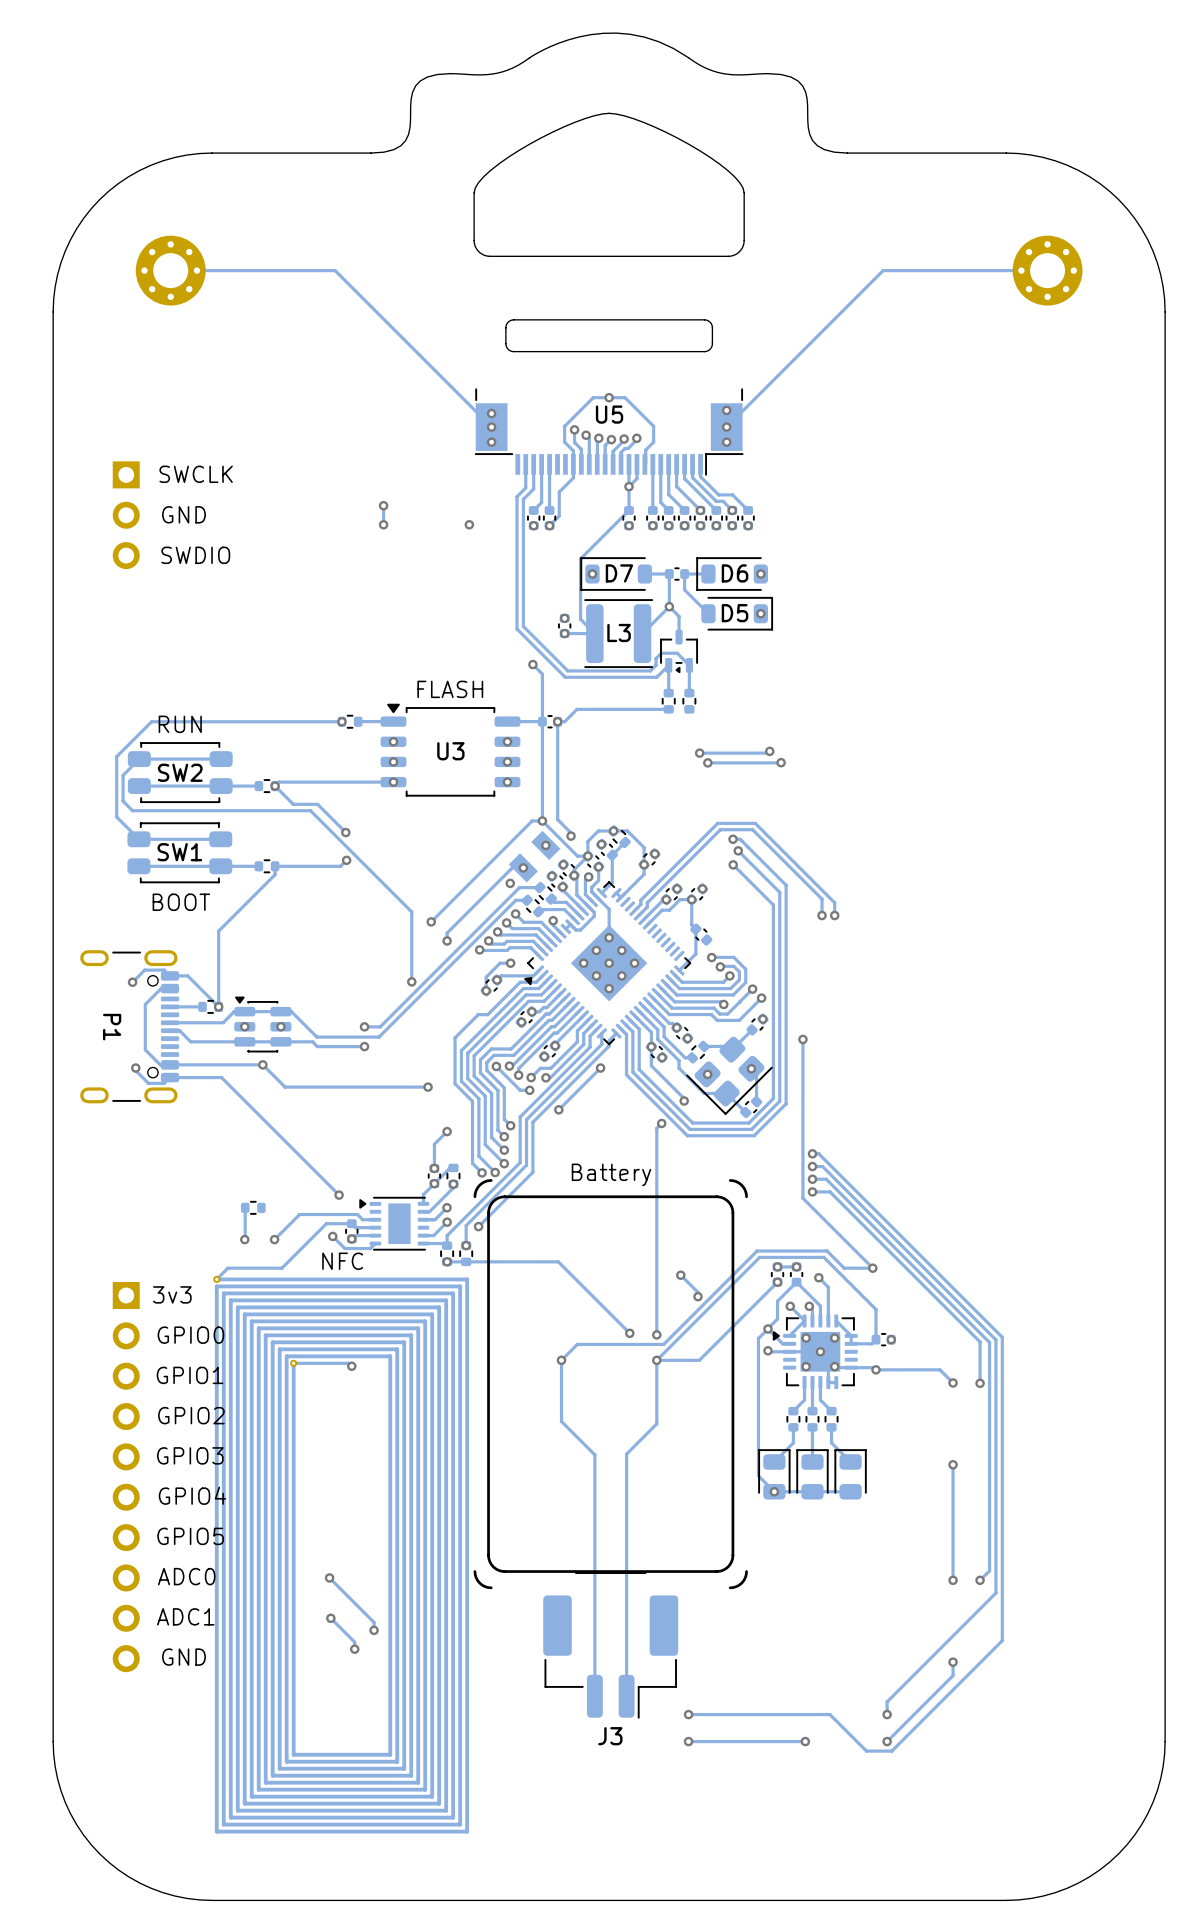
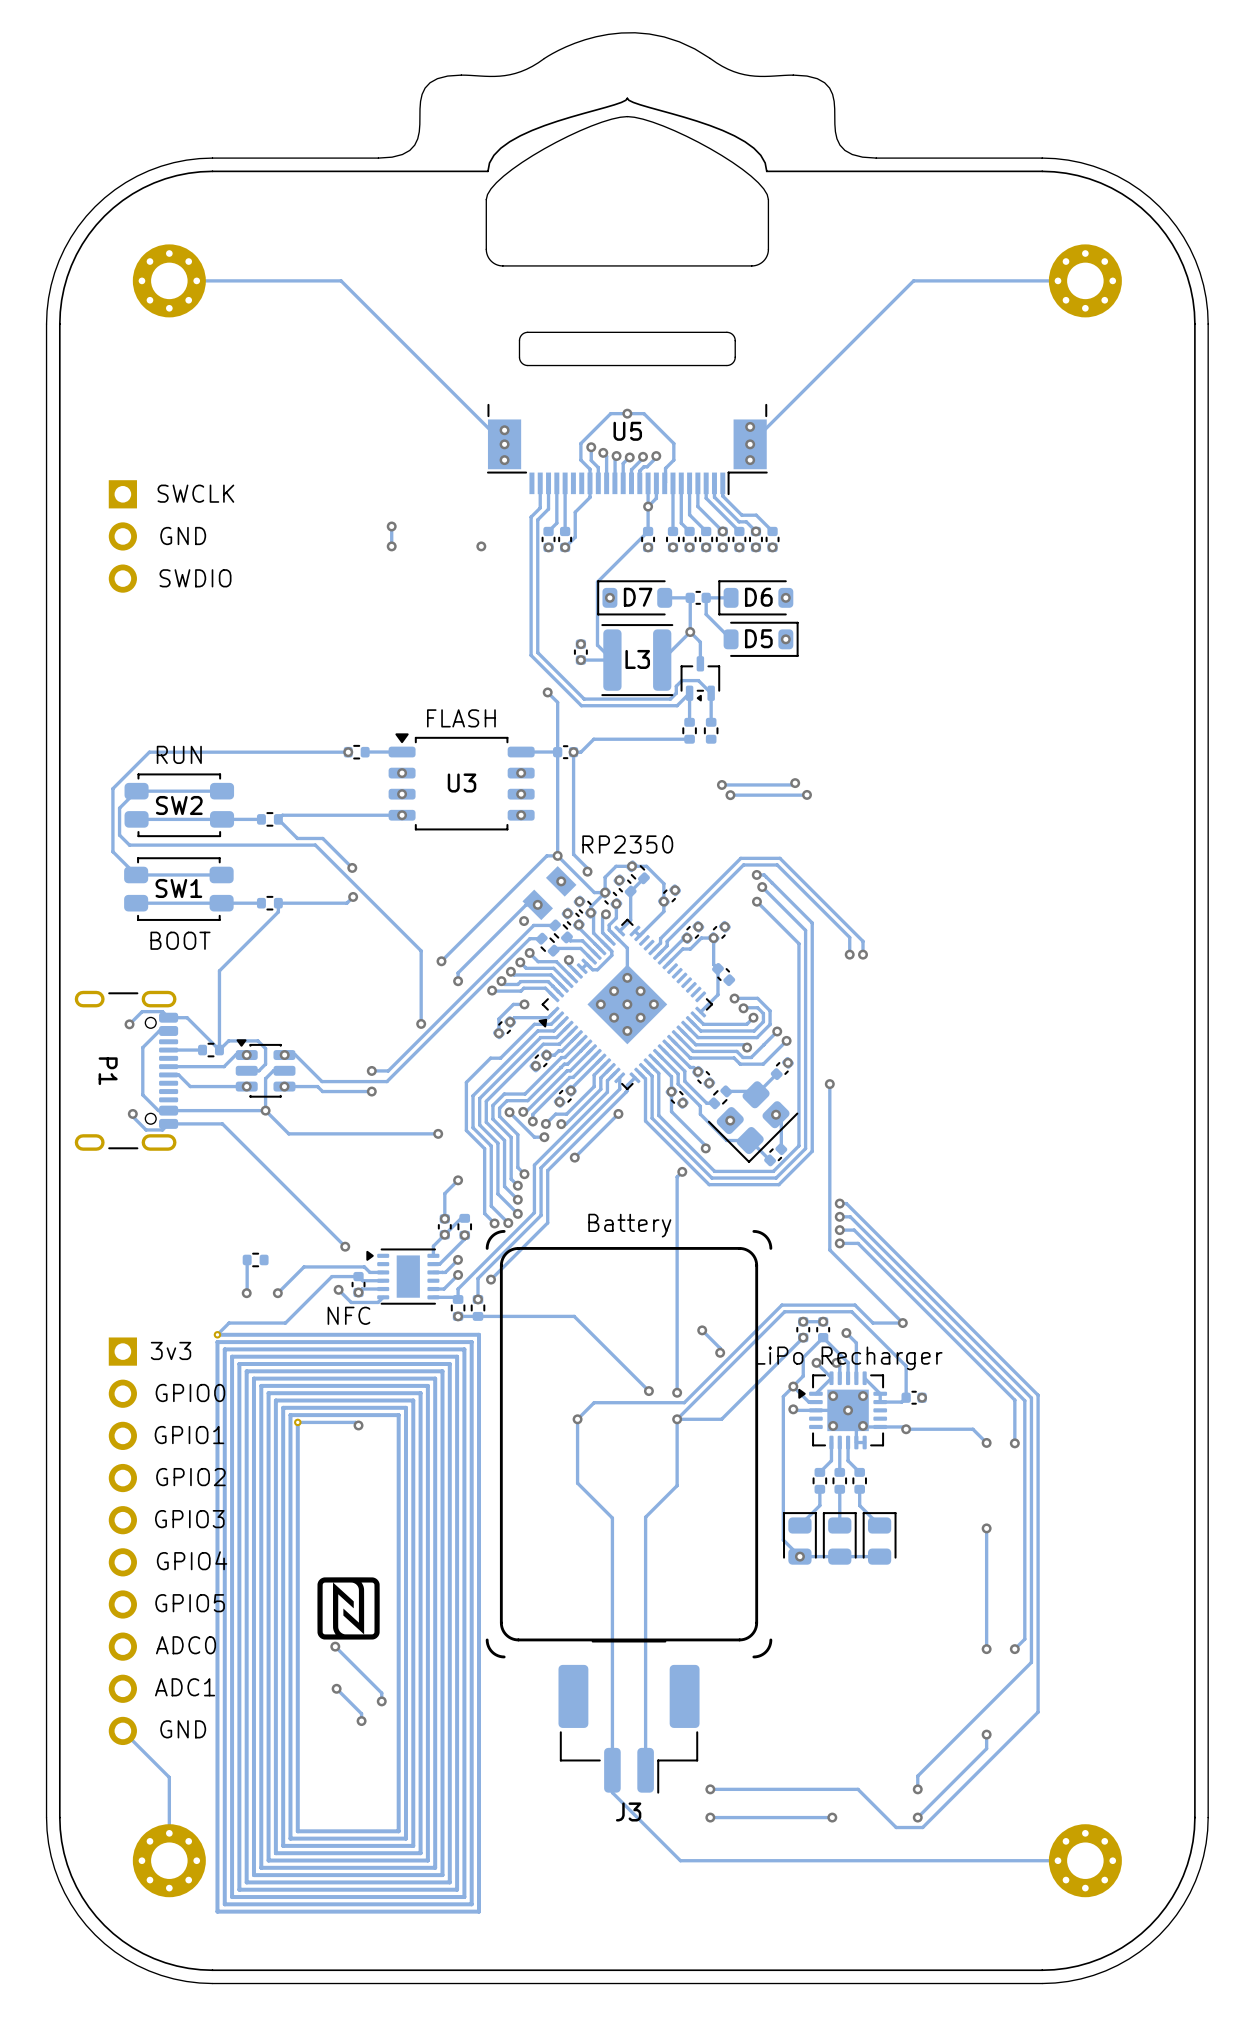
line: none -> (627, 98) (633, 102) (697, 121) (734, 135) (753, 148) (760, 155) (766, 171) (1042, 171) (1066, 173) (1089, 178) (1121, 193) (1150, 216) (1172, 244) (1187, 276) (1193, 300) (1194, 324) (1194, 1817) (1190, 1853) (1183, 1875) (1172, 1897) (1158, 1916) (1141, 1933) (1121, 1947) (1100, 1958) (1077, 1966) (1054, 1969) (212, 1970) (176, 1966) (154, 1958) (132, 1947) (113, 1933) (96, 1916) (82, 1897) (71, 1875) (64, 1853) (60, 1829) (59, 324) (64, 288) (76, 254) (96, 224) (113, 207) (132, 193) (165, 178) (188, 173) (212, 171) (487, 171) (493, 155) (500, 148) (520, 135) (557, 121) (621, 102) (627, 98)
via: (275, 786) -> none
text: none -> RP2350 (627, 844)
track: none -> (219, 1050) (228, 1040) (257, 1040) (265, 1048) (265, 1064) (258, 1070) (246, 1070)
via: (218, 1006) -> none
via: none -> (246, 1055)
track: (280, 1011) (244, 1011) -> none
via: none -> (284, 1055)
via: (244, 1026) -> none
track: none -> (284, 1070) (273, 1070) (265, 1078) (265, 1110)
via: (280, 1026) -> none
via: none -> (246, 1086)
track: (280, 1041) (244, 1041) -> none
via: none -> (284, 1086)
text: none -> LiPo Recharger (849, 1358)
drawing: none -> [317, 1577, 380, 1640]
track: none -> (122, 1730) (169, 1777) (169, 1860)
track: none -> (612, 1770) (612, 1792) (680, 1860) (1085, 1860)
part: none -> (169, 1860)
part: none -> (1085, 1860)

